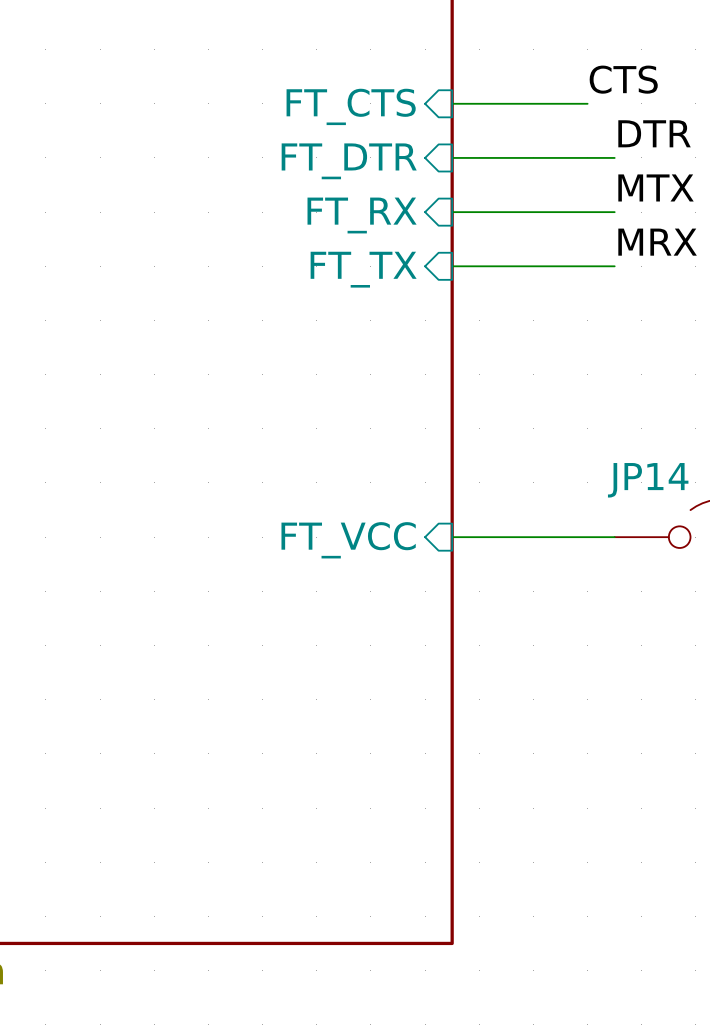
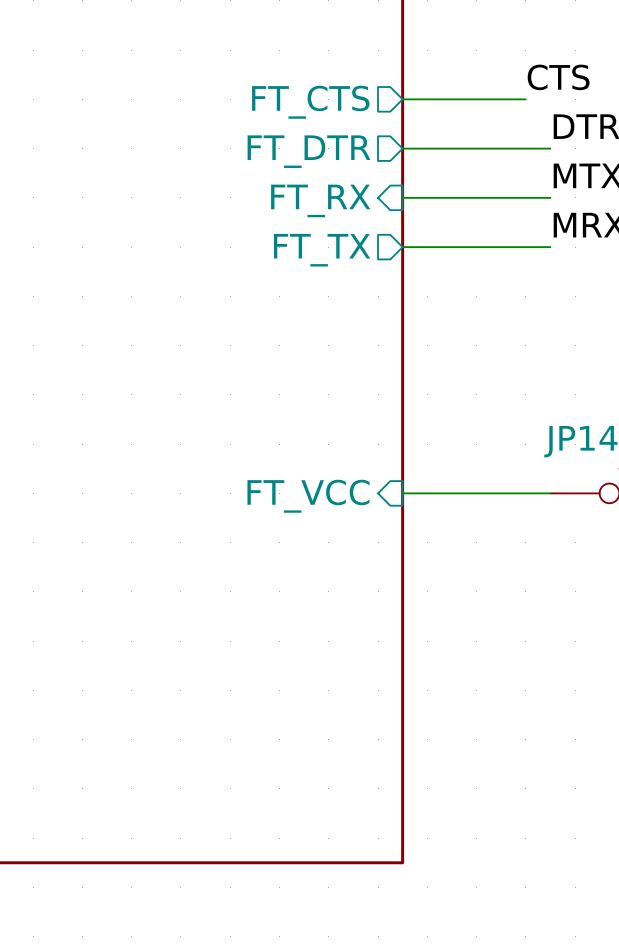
sheet pin shape: input (351, 106) -> output (310, 102)
sheet pin shape: input (349, 161) -> output (308, 151)
sheet pin shape: input (363, 269) -> output (322, 250)

